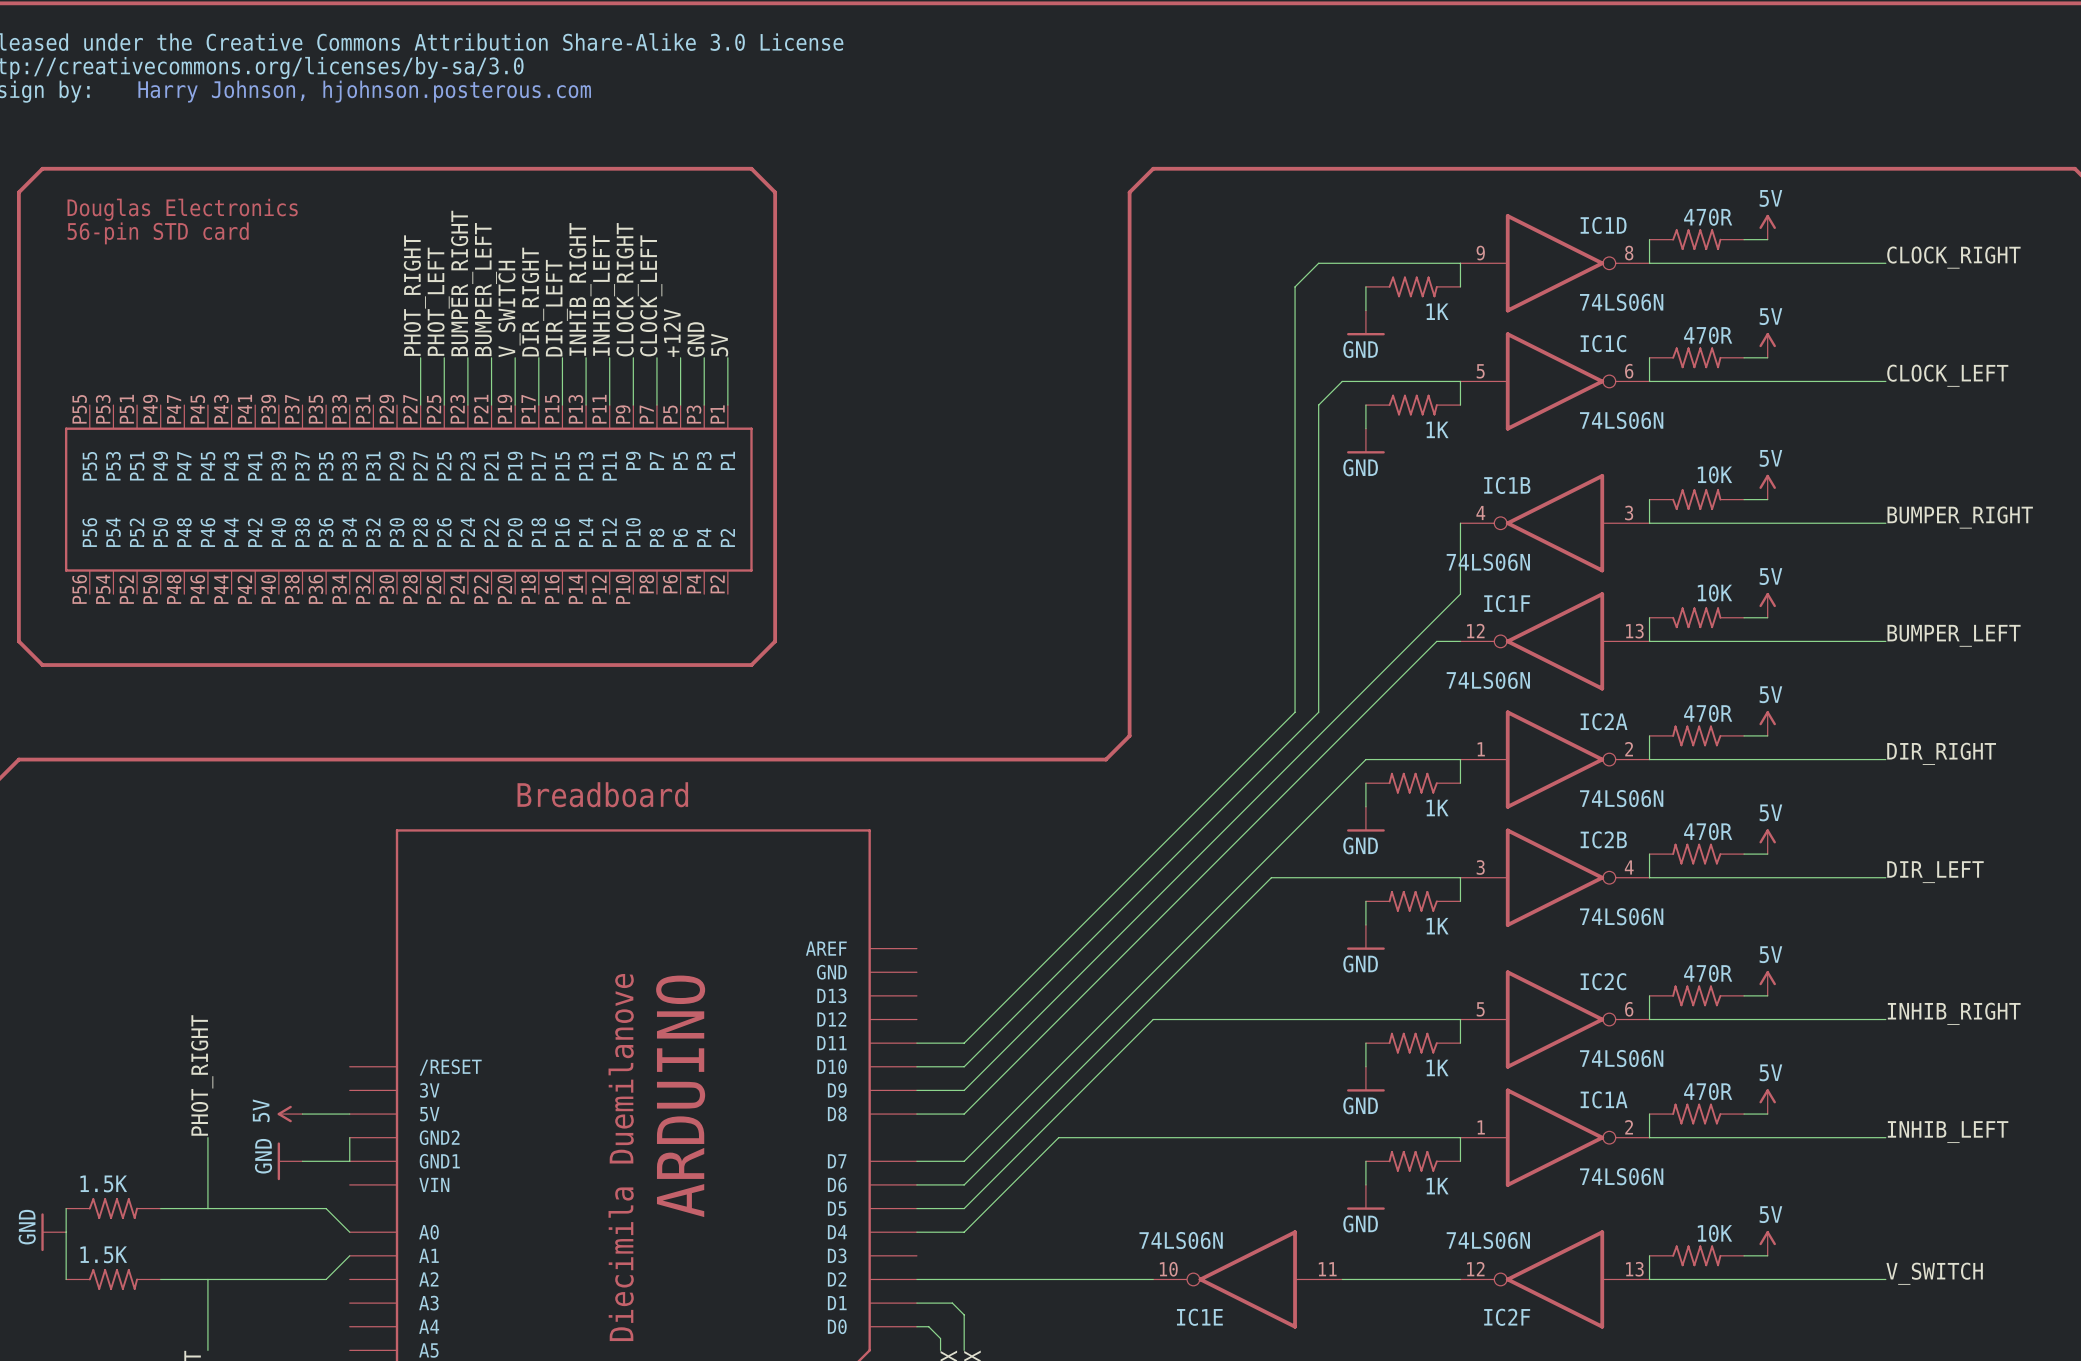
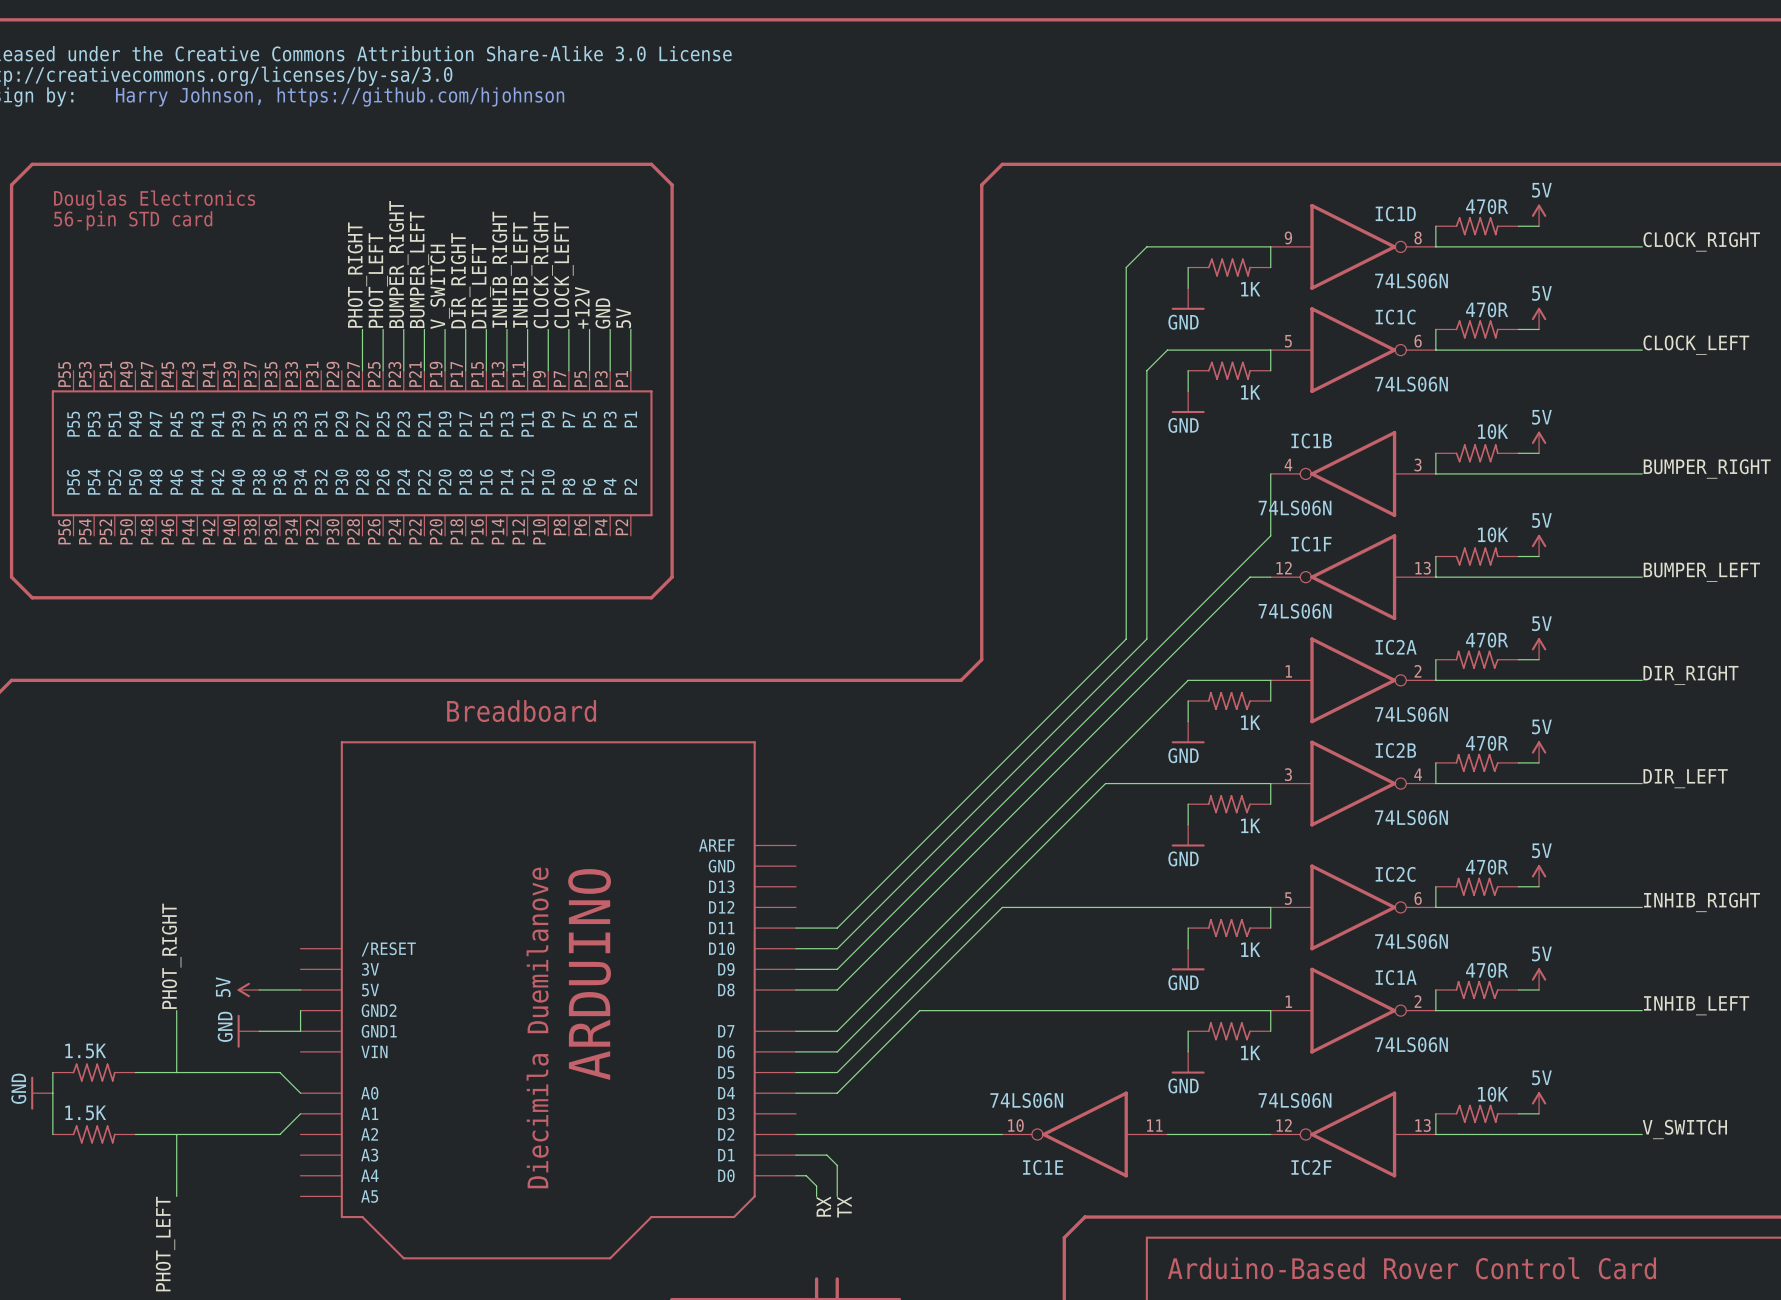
text: Harry Johnson, hjohnson.posterous.com (364, 91) -> Harry Johnson, https://github.com/hjohnson (340, 96)

